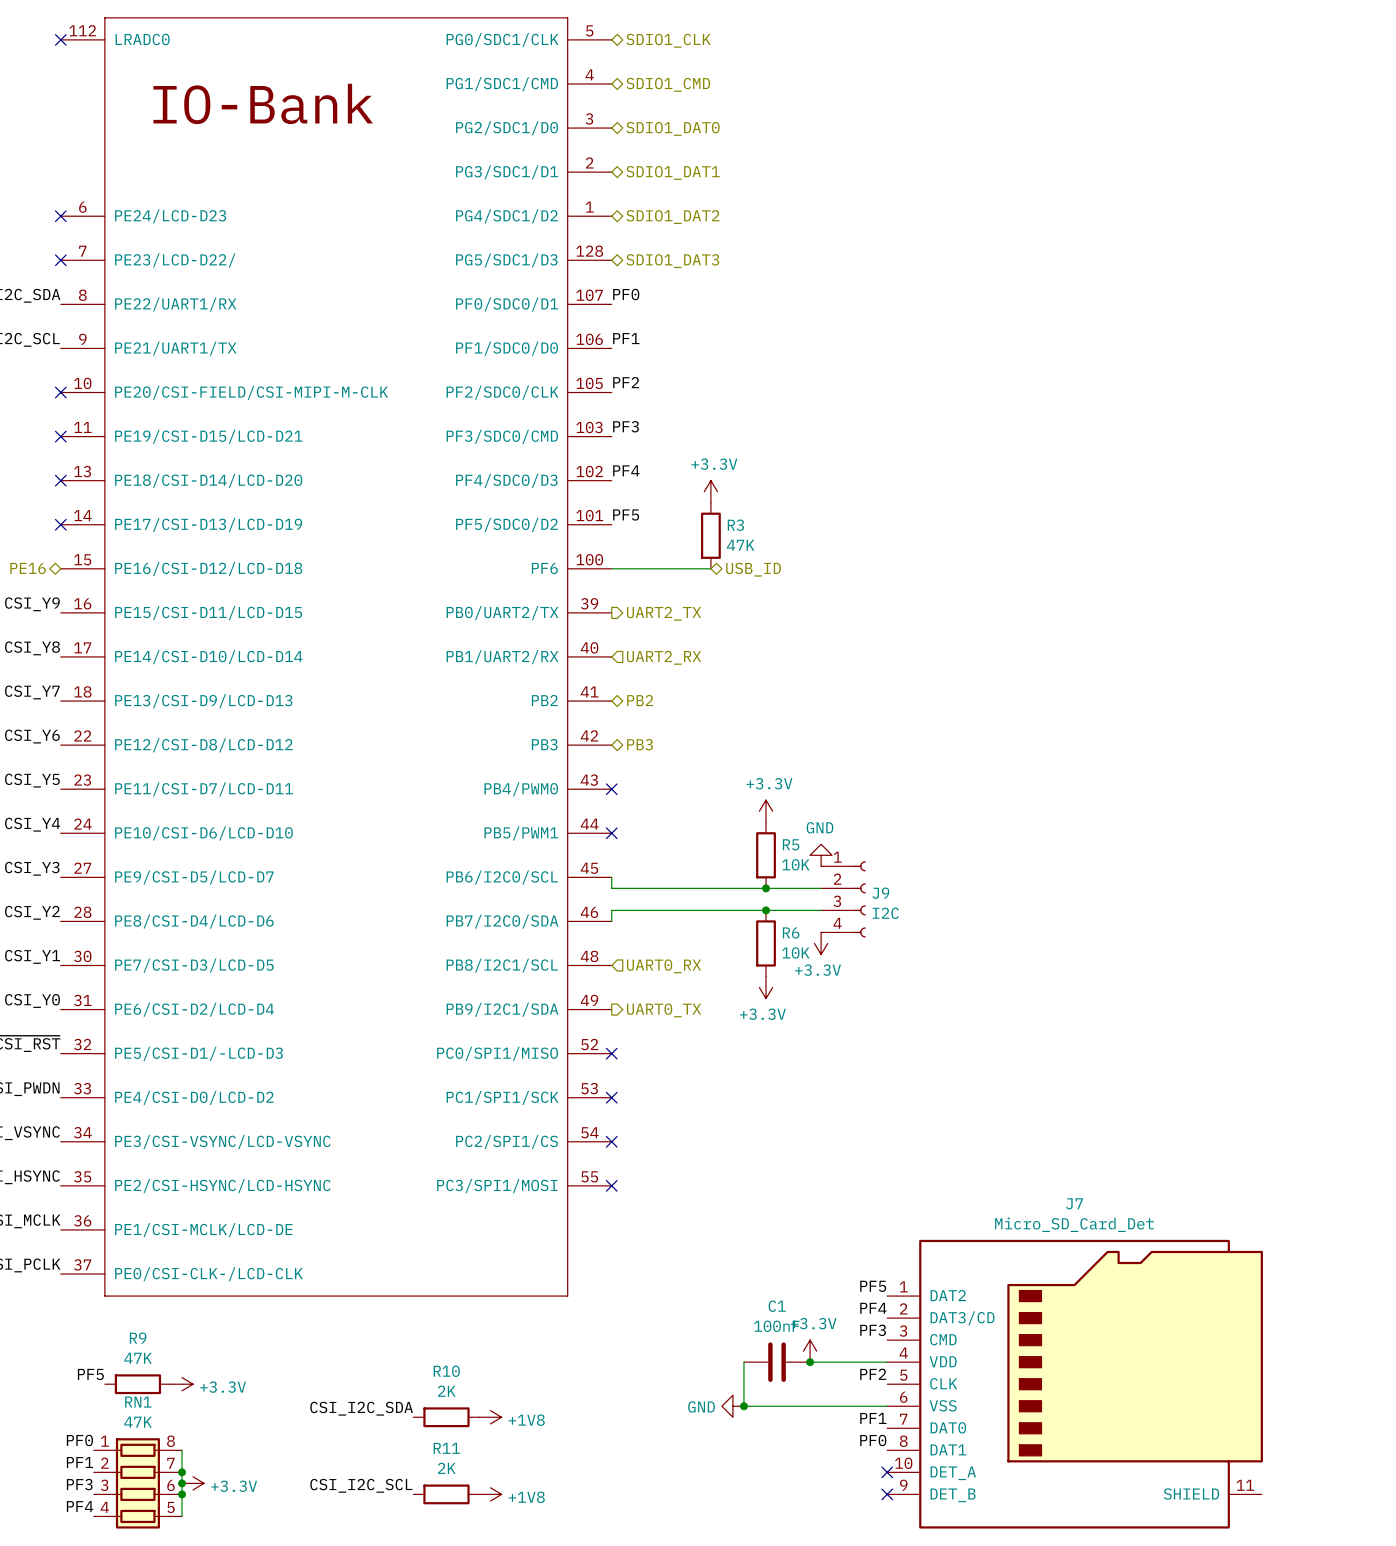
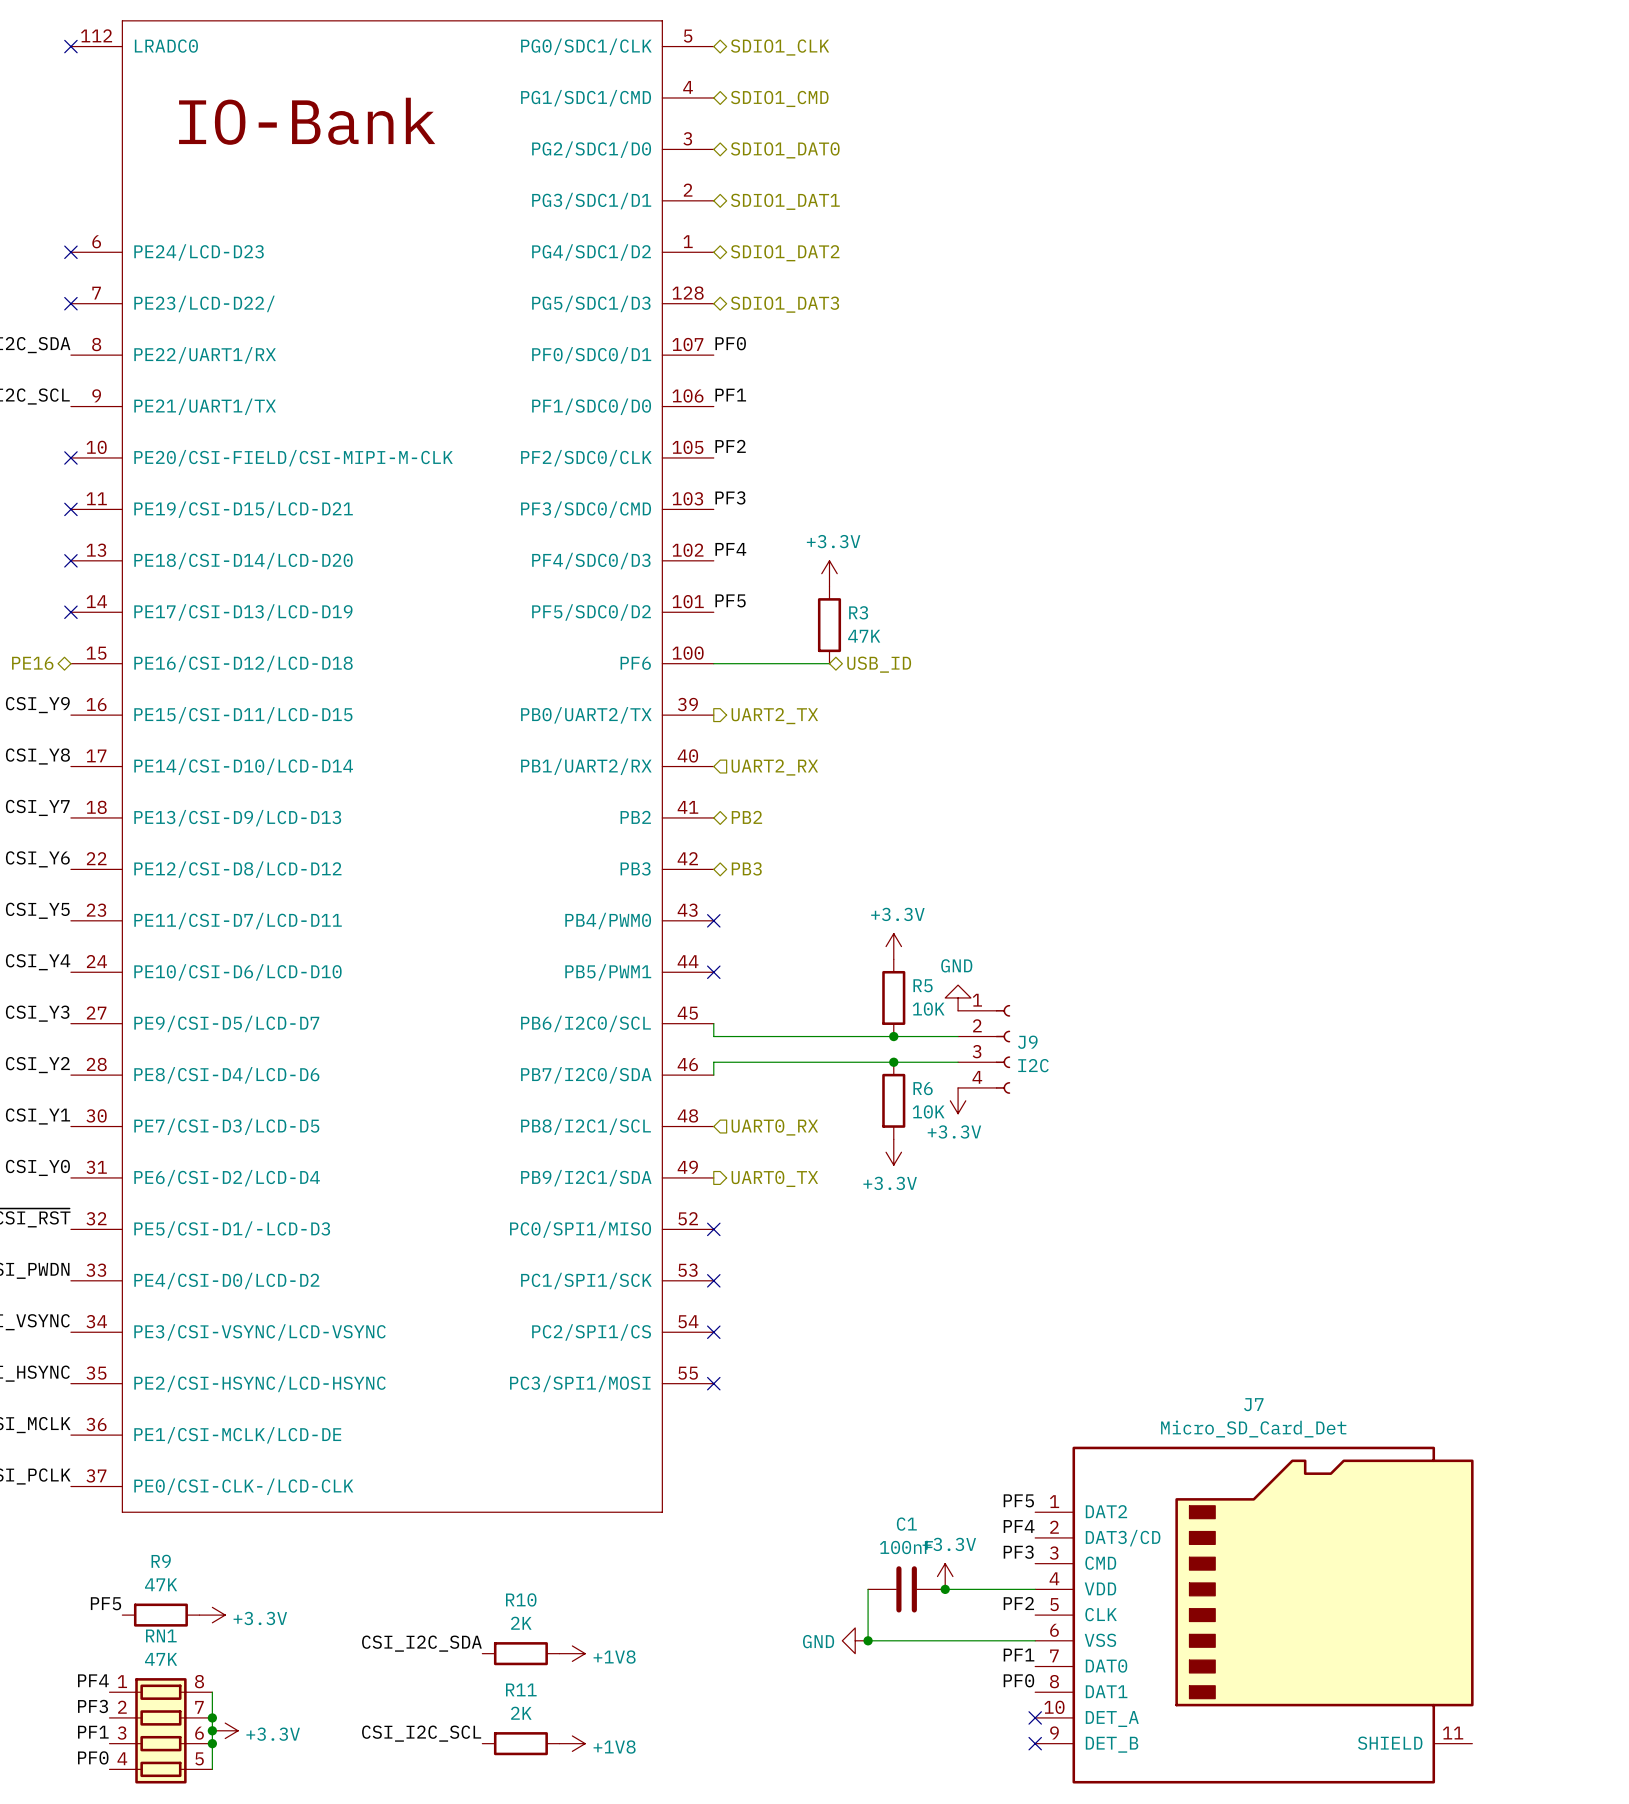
label: PF0 (79, 1440) -> PF4 (93, 1680)
label: PF1 (79, 1462) -> PF3 (93, 1706)
label: PF3 (79, 1484) -> PF1 (93, 1732)
label: PF4 (80, 1506) -> PF0 (93, 1757)

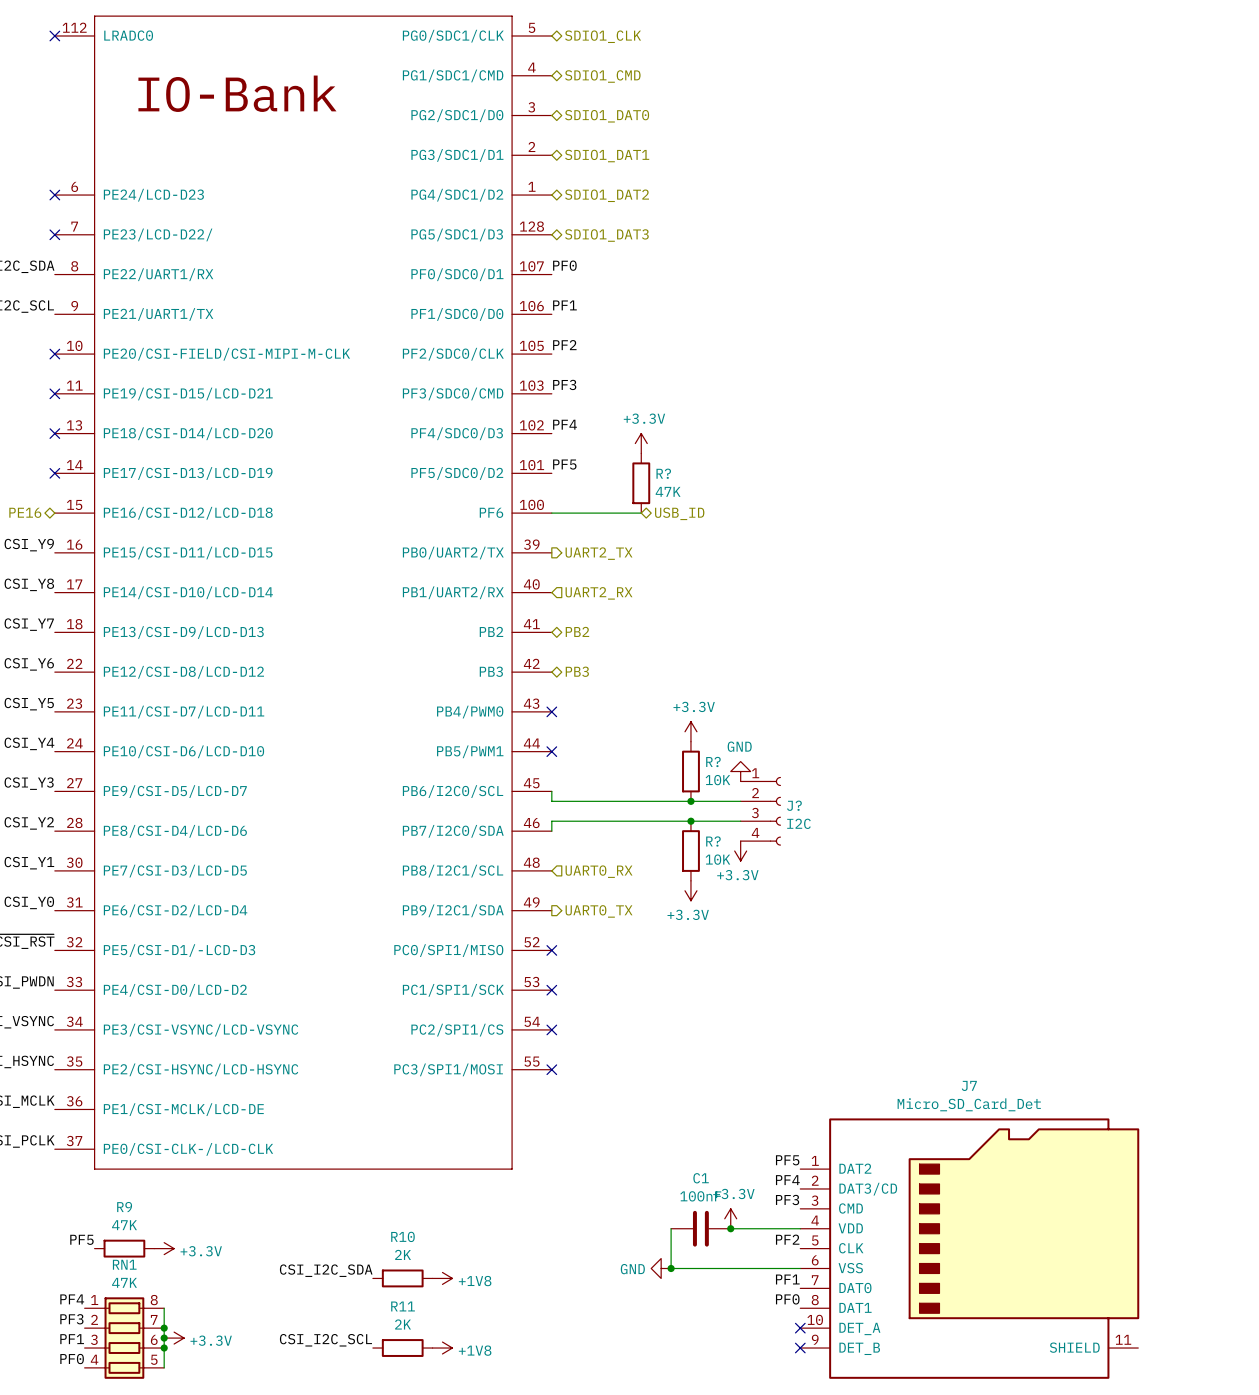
R3 name: R3 (858, 612) -> R? (663, 473)
R5 name: R5 (923, 985) -> R? (713, 761)
J9 name: J9 (1027, 1042) -> J? (794, 805)
R6 name: R6 (923, 1088) -> R? (713, 841)

